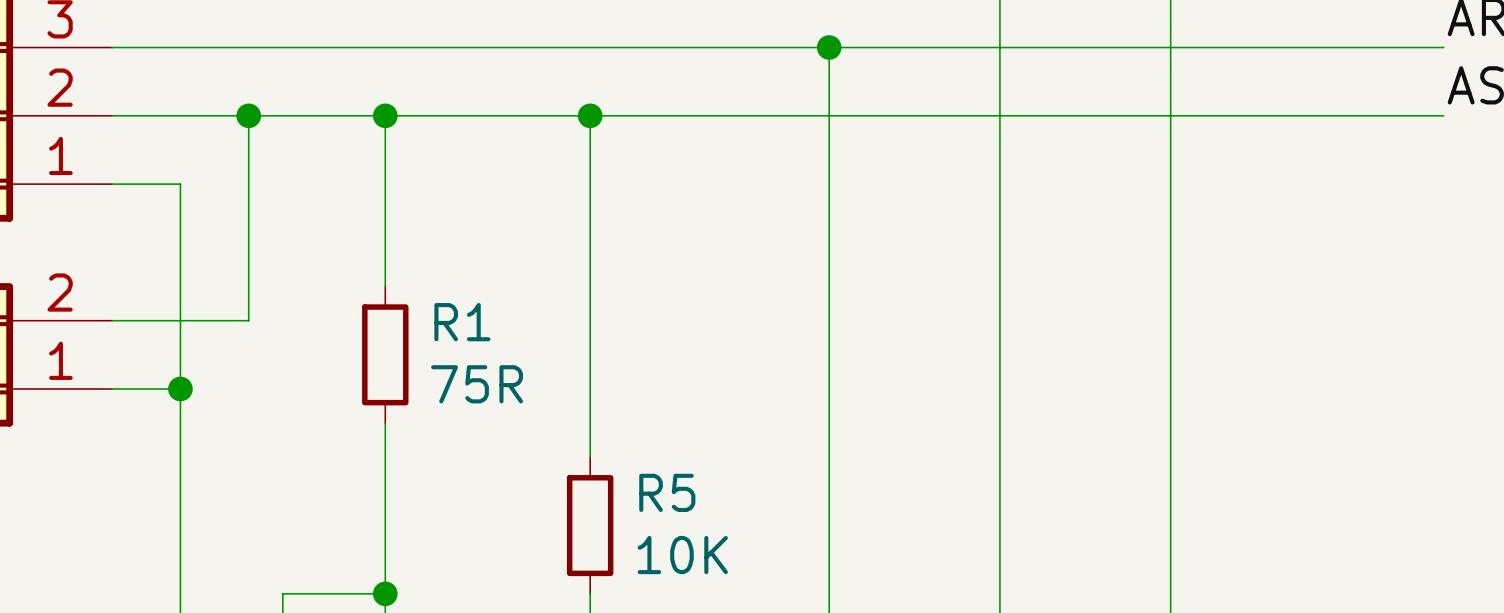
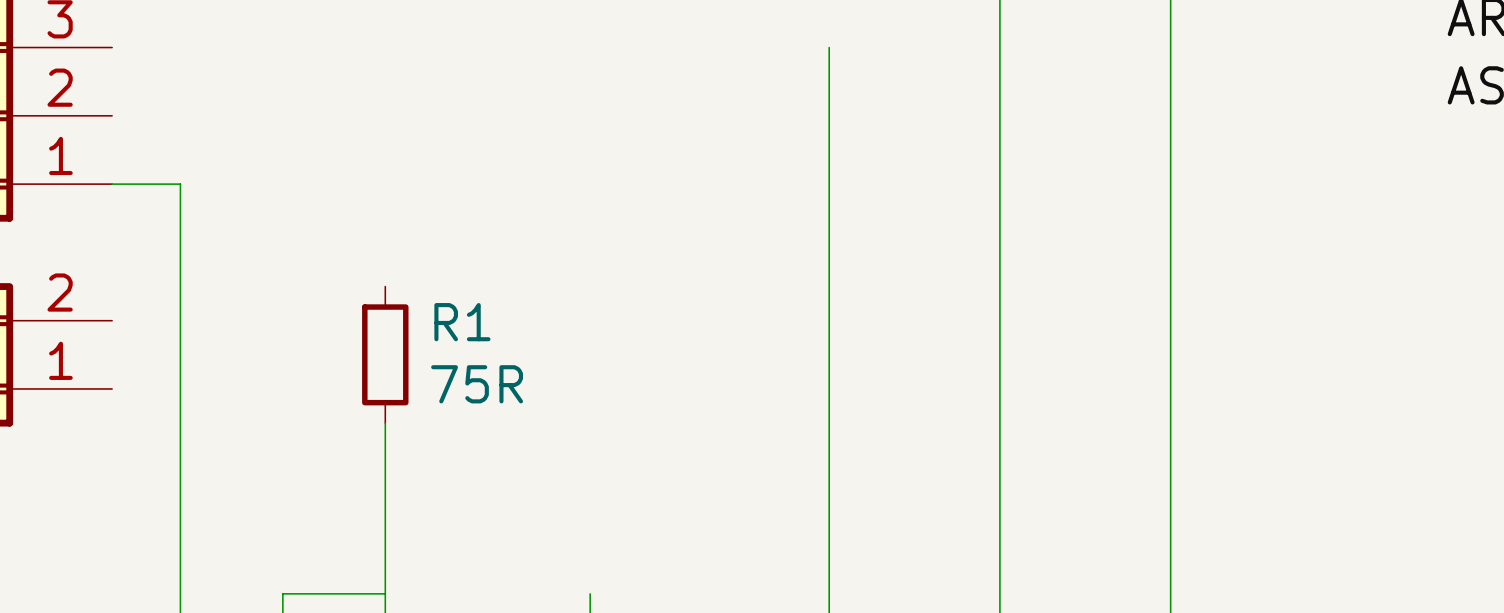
wire: (112, 47) (1443, 47) -> none
junction: (829, 47) -> none
wire: (112, 115) (1443, 115) -> none
wire: (248, 115) (248, 320) (112, 320) -> none
junction: (248, 115) -> none
wire: (385, 115) (385, 286) -> none
junction: (385, 115) -> none
wire: (590, 115) (590, 457) -> none
junction: (590, 115) -> none
wire: (112, 388) (180, 388) -> none
junction: (180, 388) -> none
R5: 10K (590, 525) -> none
junction: (385, 593) -> none

